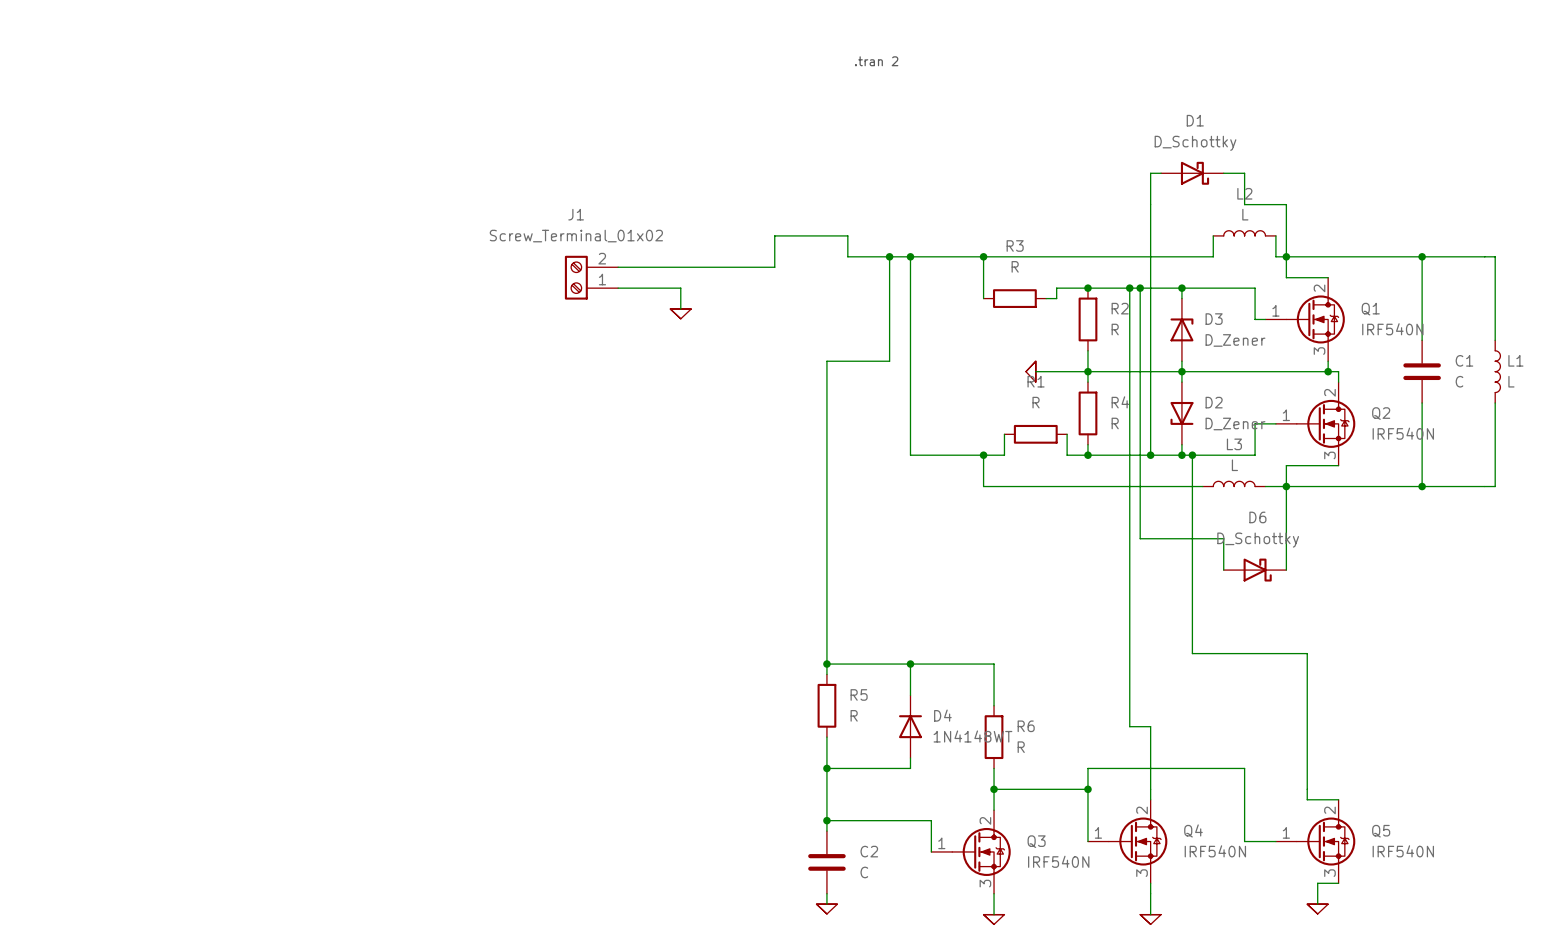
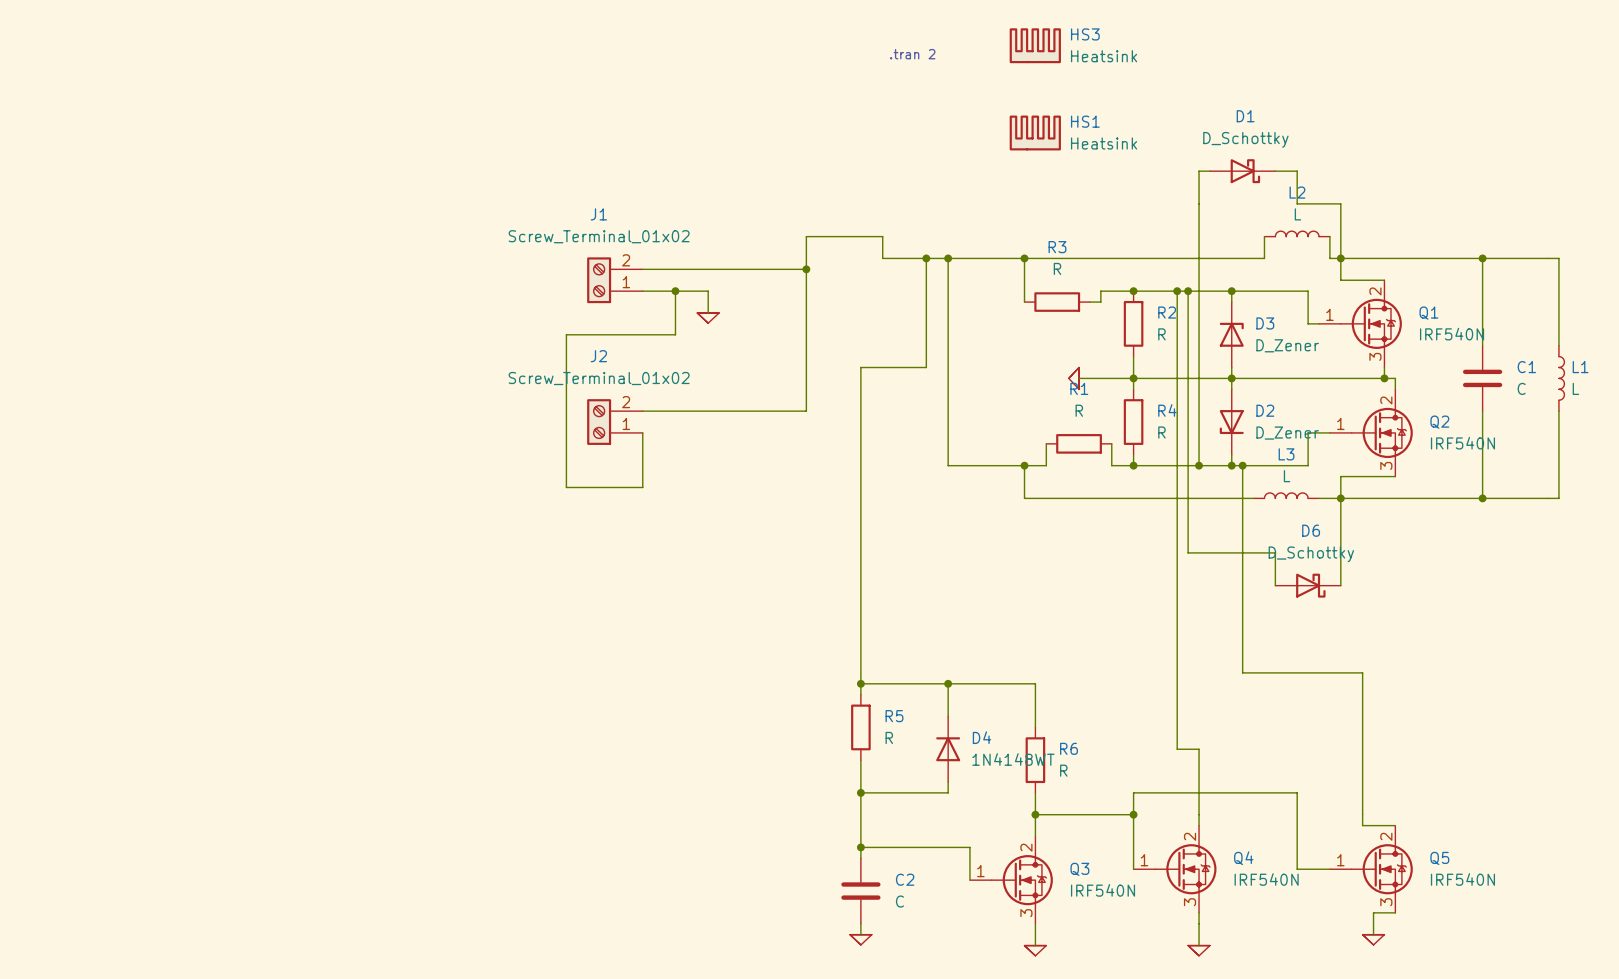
HS3: none -> Heatsink (1035, 45)
HS1: none -> Heatsink (1035, 133)
wire: none -> (806, 269) (806, 411) (642, 411)
junction: none -> (806, 269)
wire: none -> (675, 291) (675, 334) (566, 334) (566, 487) (642, 487) (642, 432)
junction: none -> (675, 291)
J2: none -> Screw_Terminal_01x02 (614, 422)

